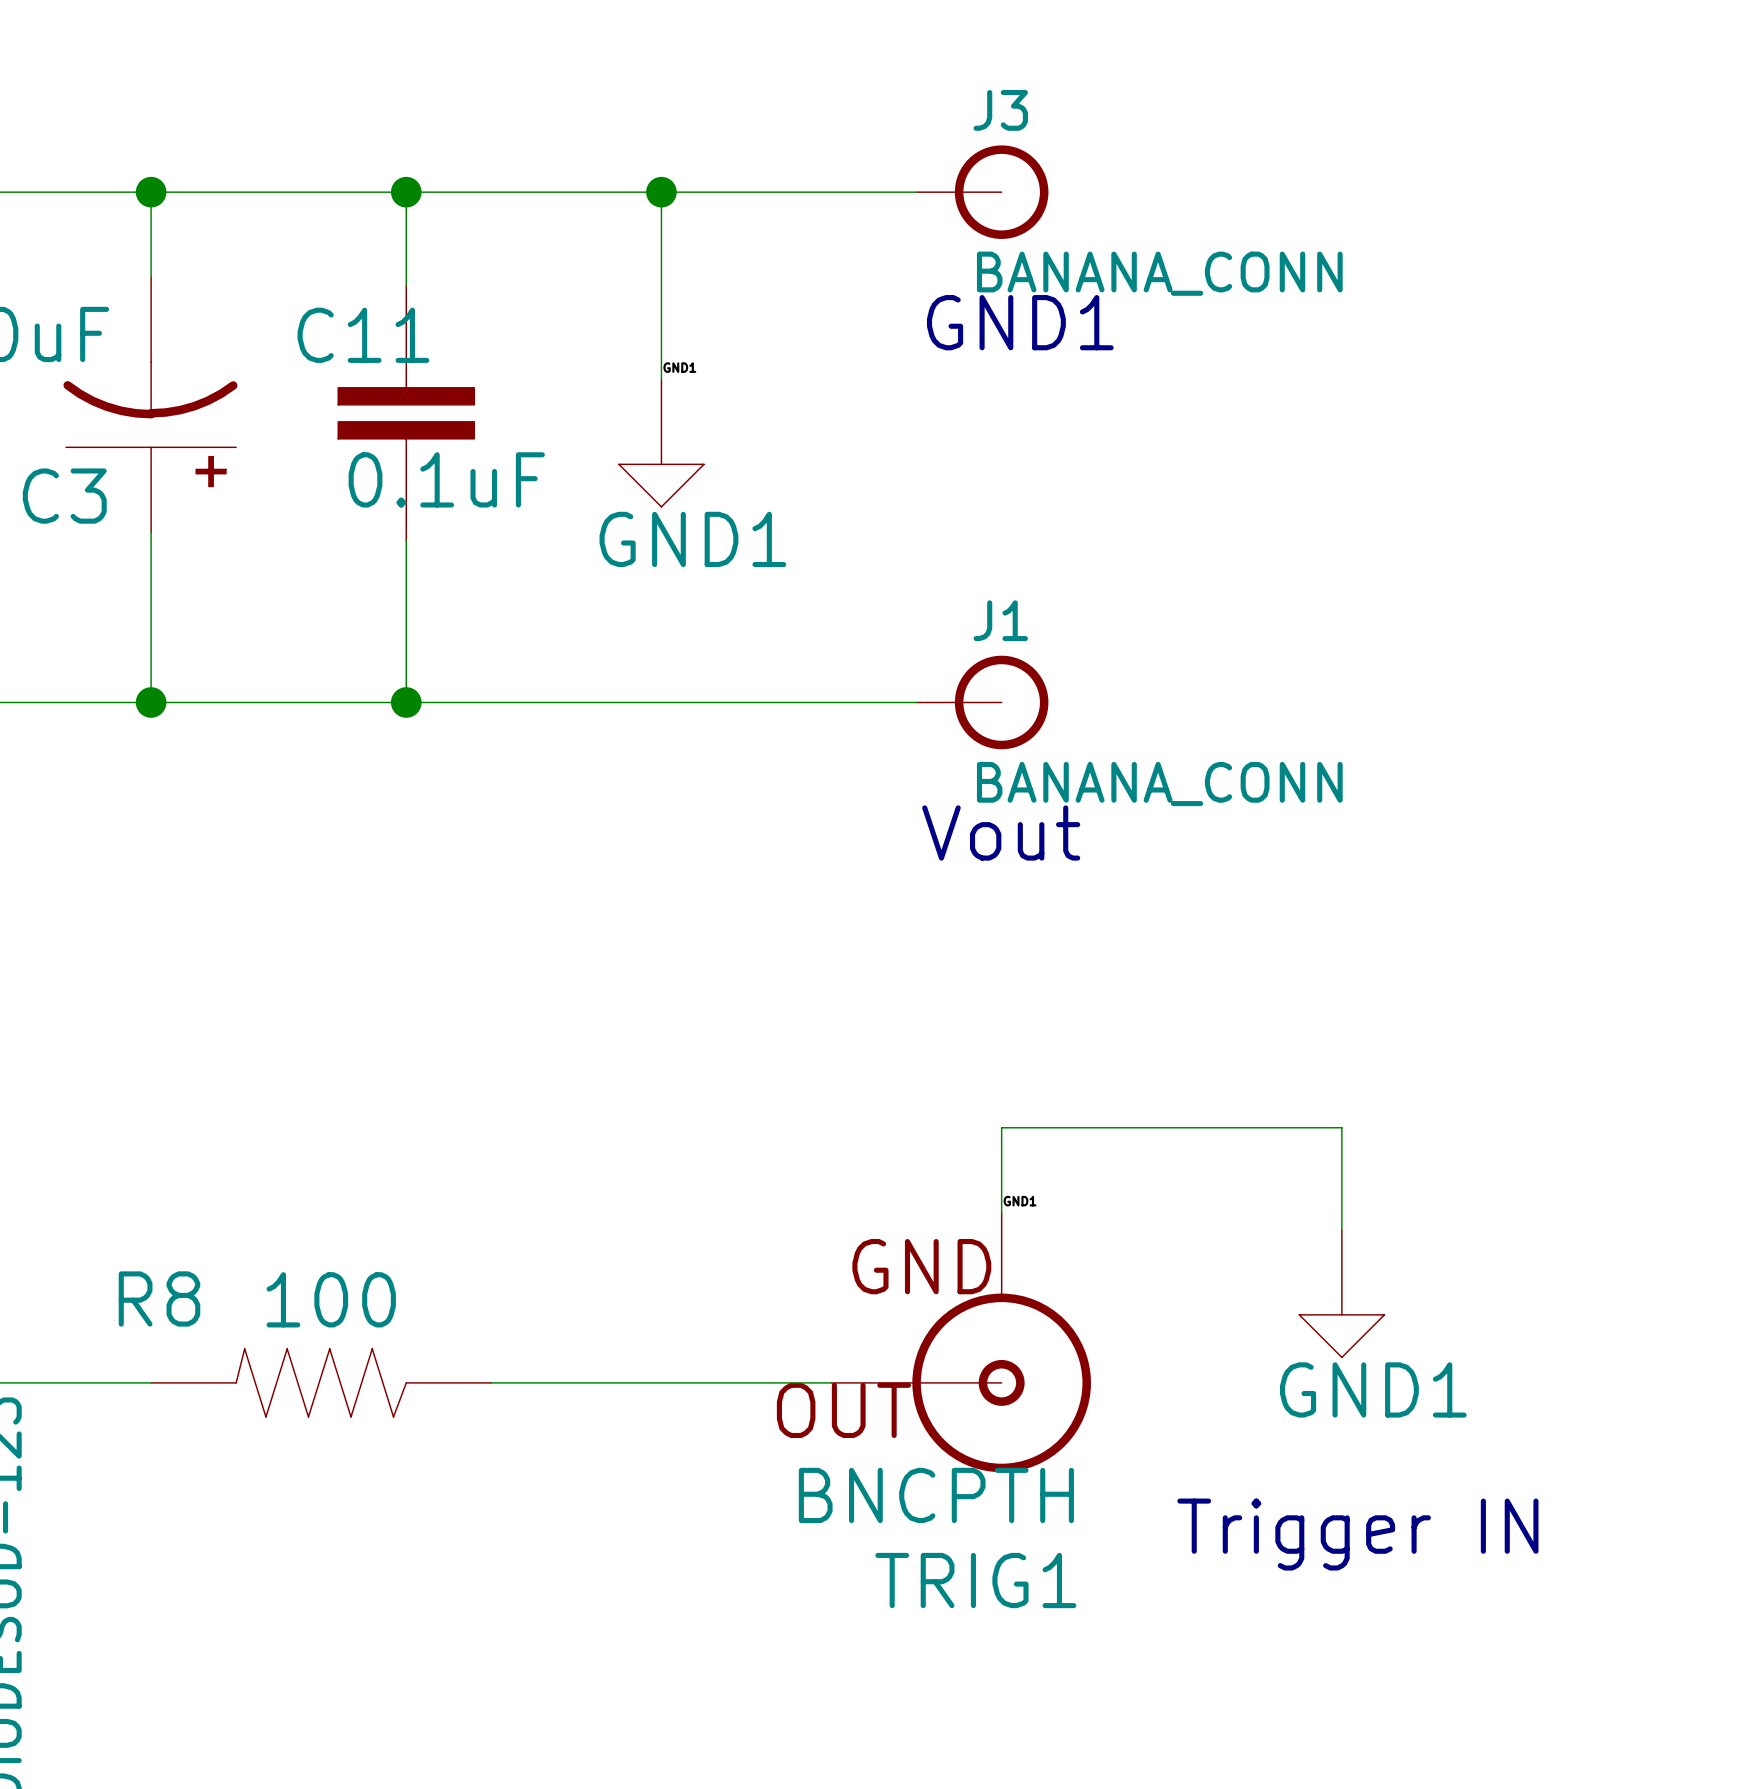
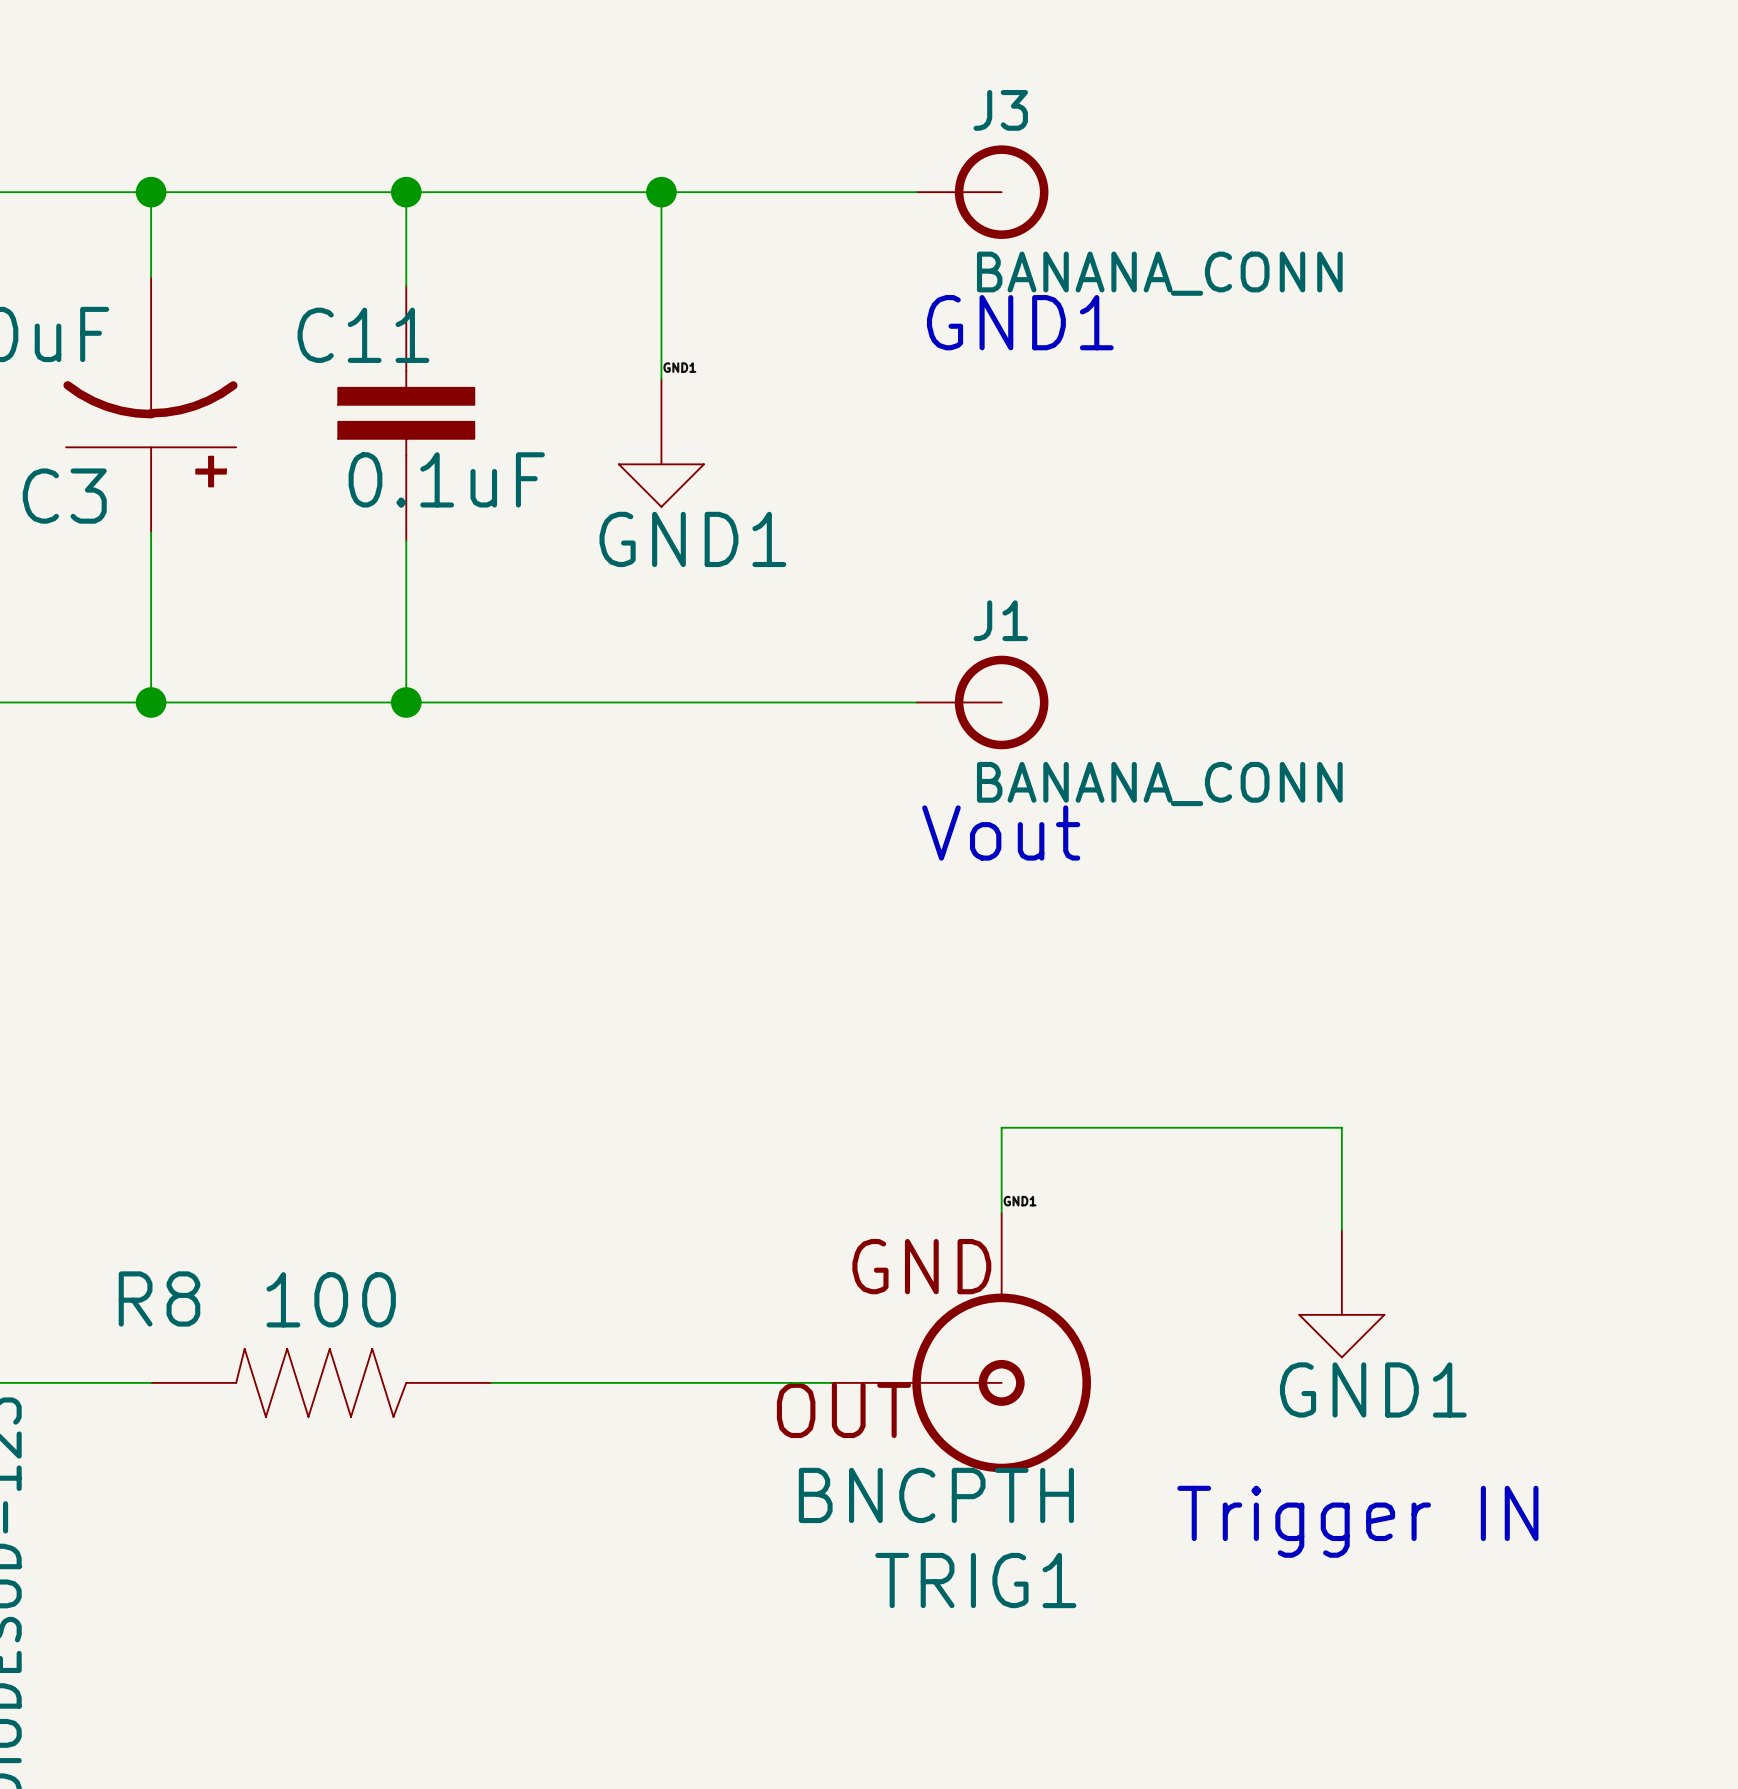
text position: Trigger IN (1357, 1534) -> Trigger IN (1357, 1521)

